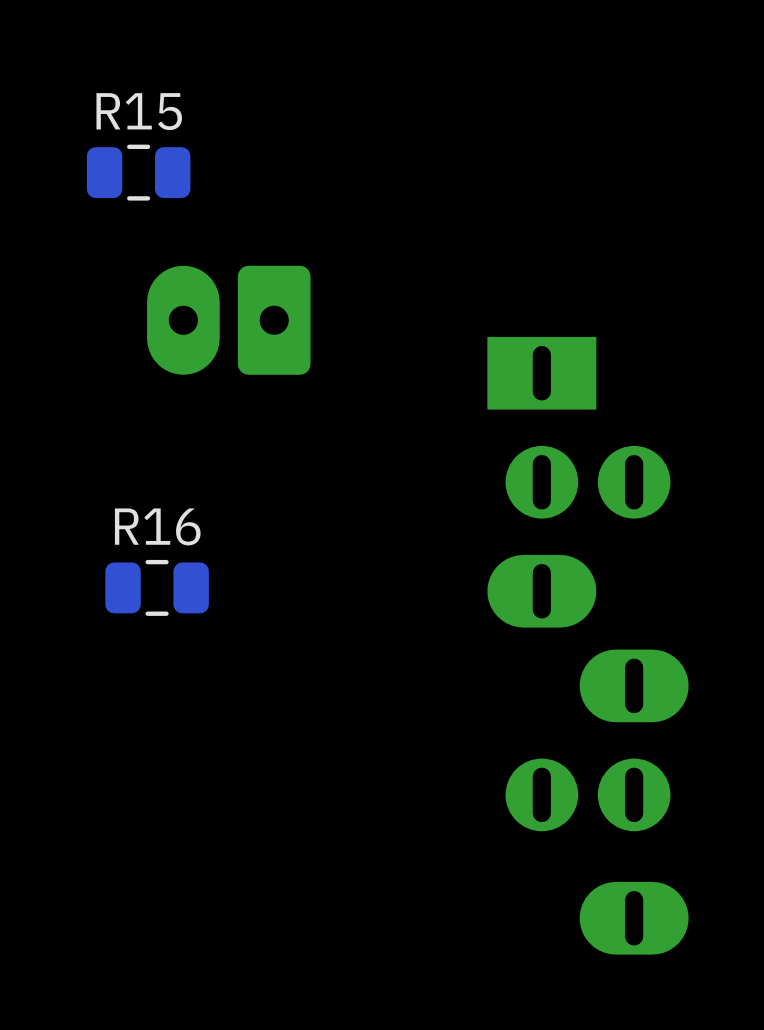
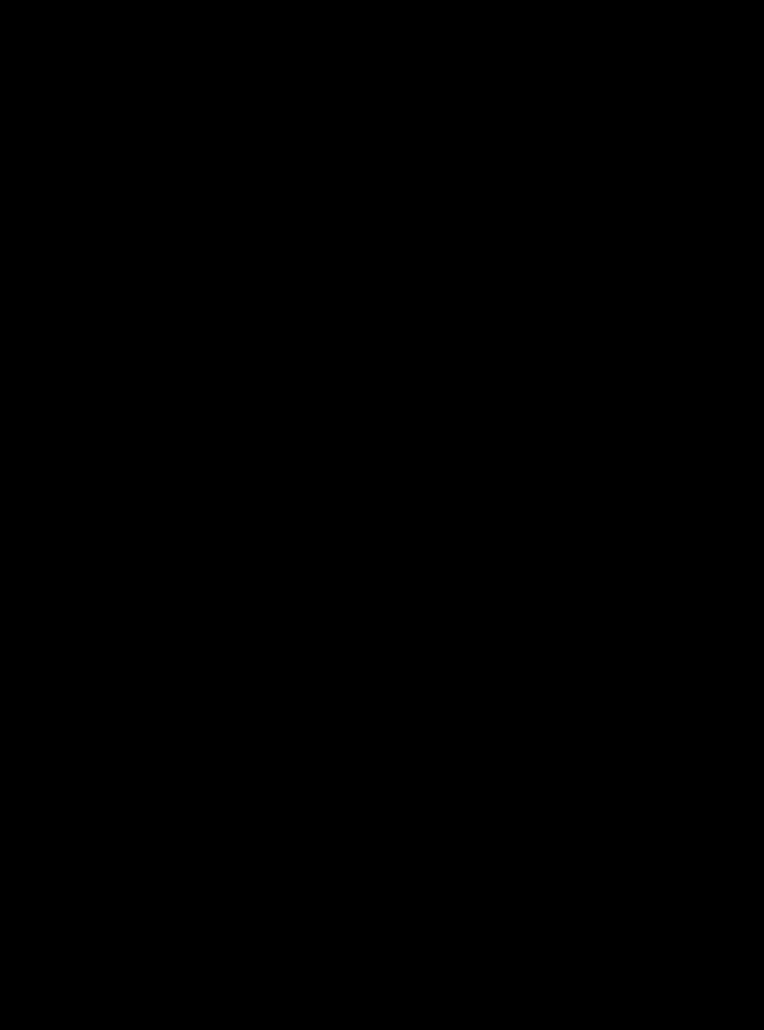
R15: (138, 172) -> none
part: (228, 320) -> none
R16: (157, 587) -> none
part: (588, 645) -> none

